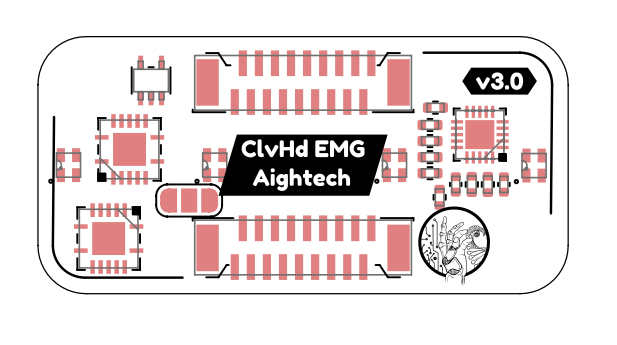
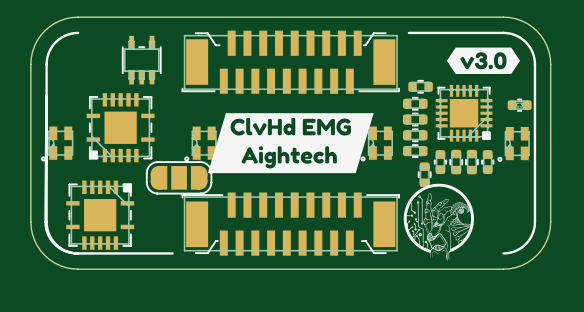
line: none -> (78, 32) (67, 34) (55, 42) (48, 54) (46, 64) (46, 225) (49, 235) (58, 246) (67, 251) (78, 253)
line: (519, 52) (530, 54) (540, 59) (547, 67) (551, 77) (550, 213) -> (503, 32) (513, 34) (525, 42) (533, 54) (534, 64) (534, 225) (530, 238) (523, 246) (513, 251) (503, 253)
part: none -> (519, 105)

